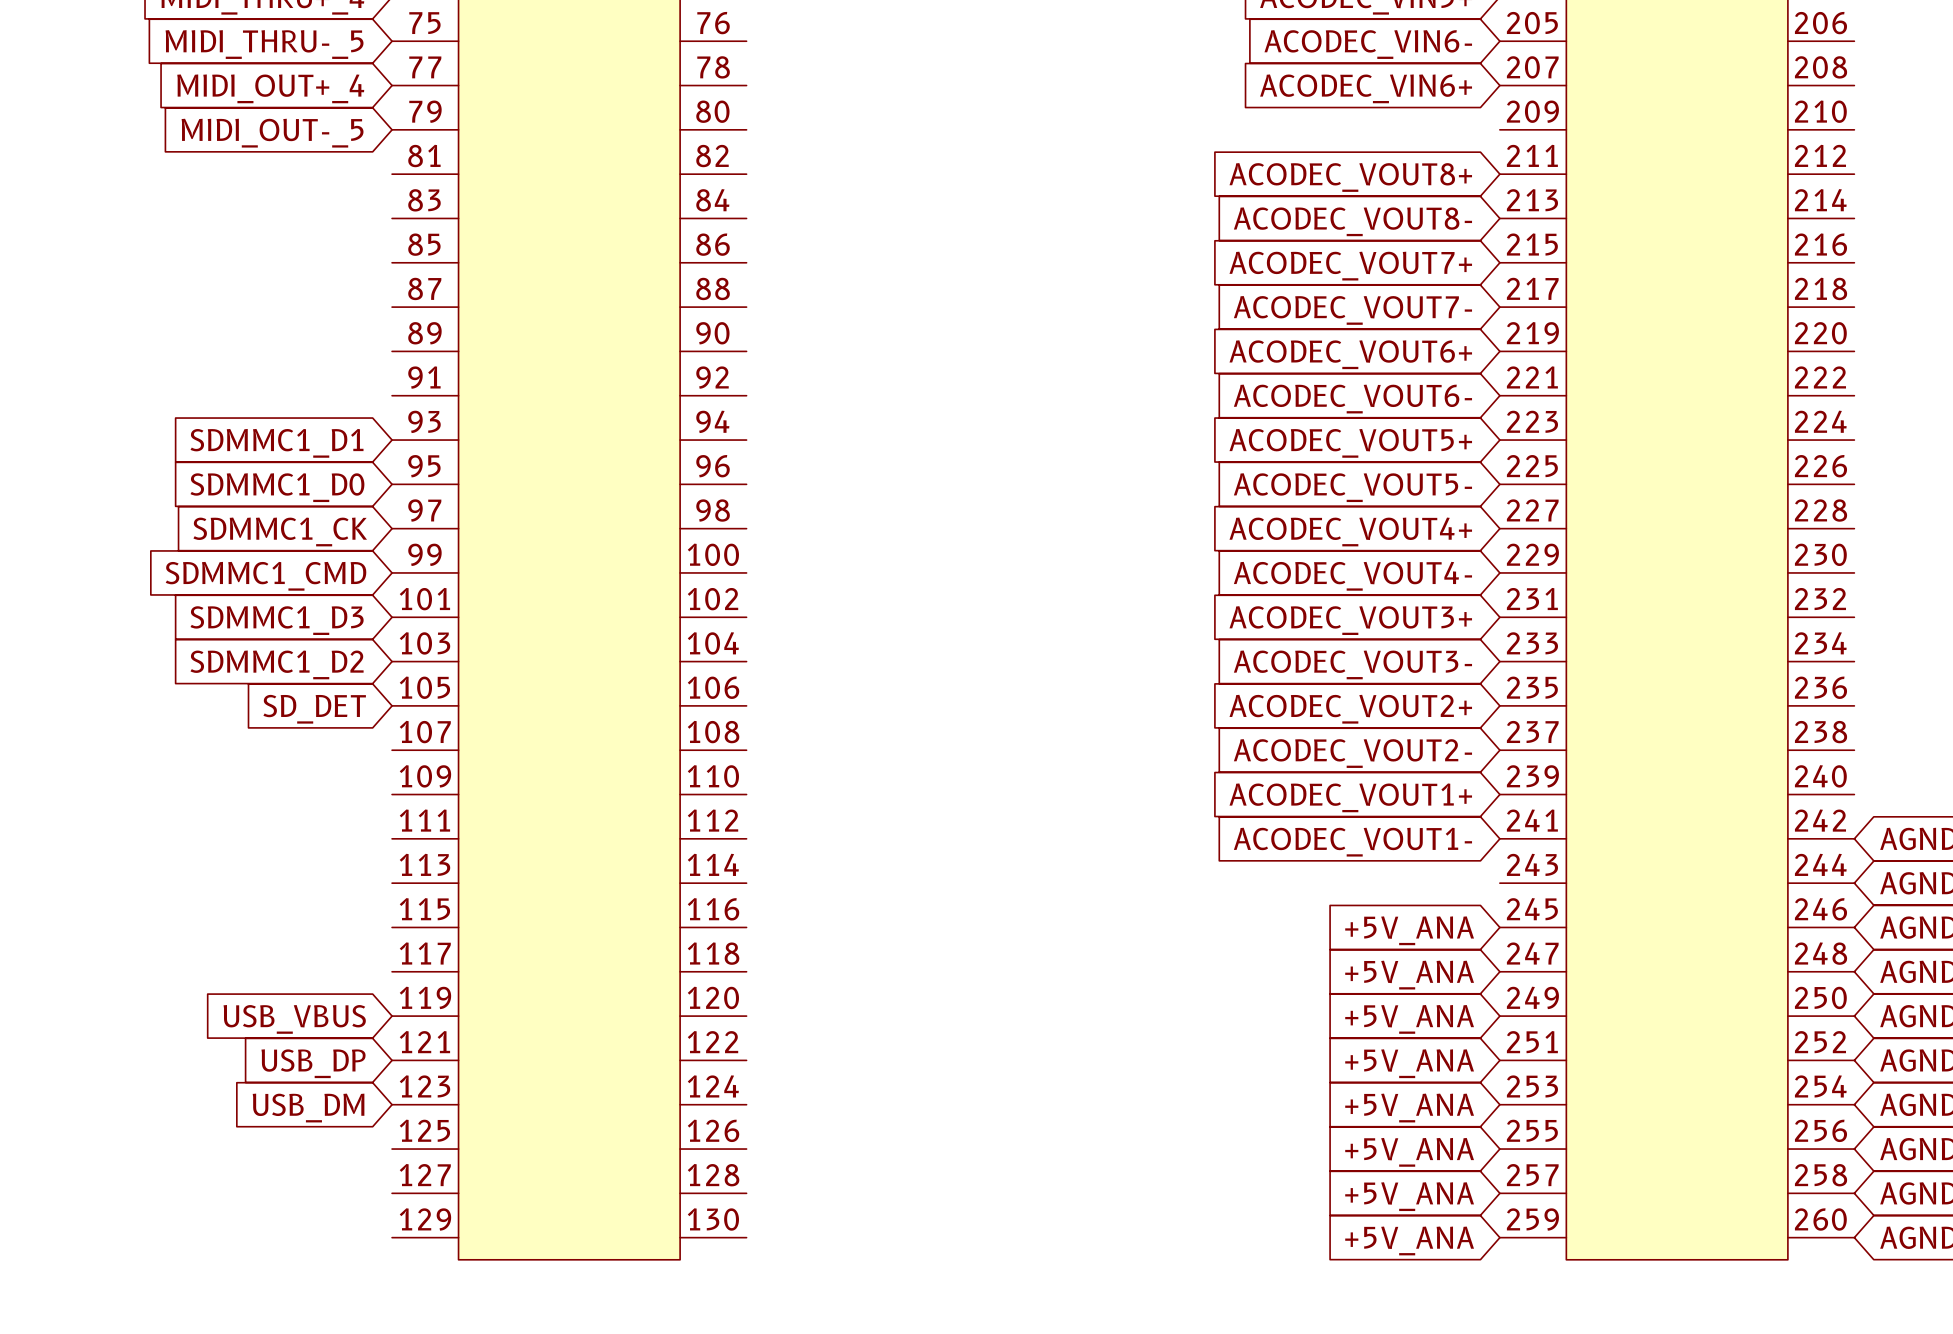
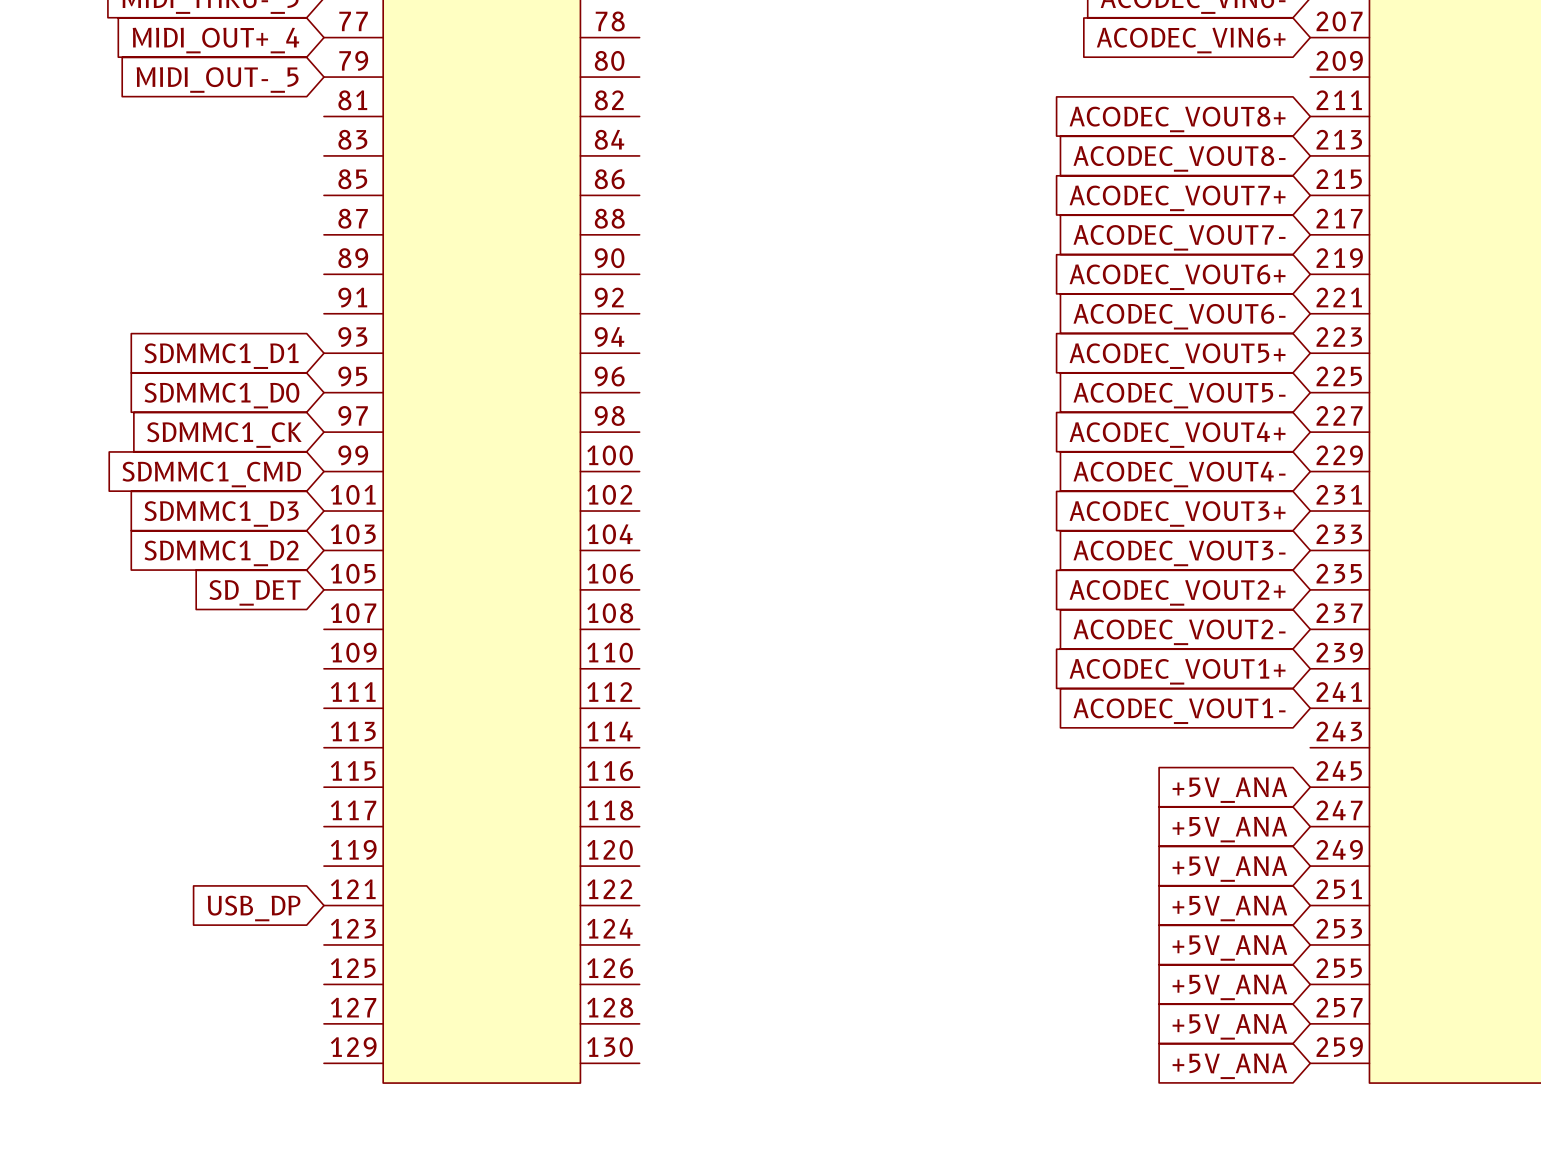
global label: USB_VBUS (294, 1019) -> none
global label: USB_DM (308, 1108) -> none

